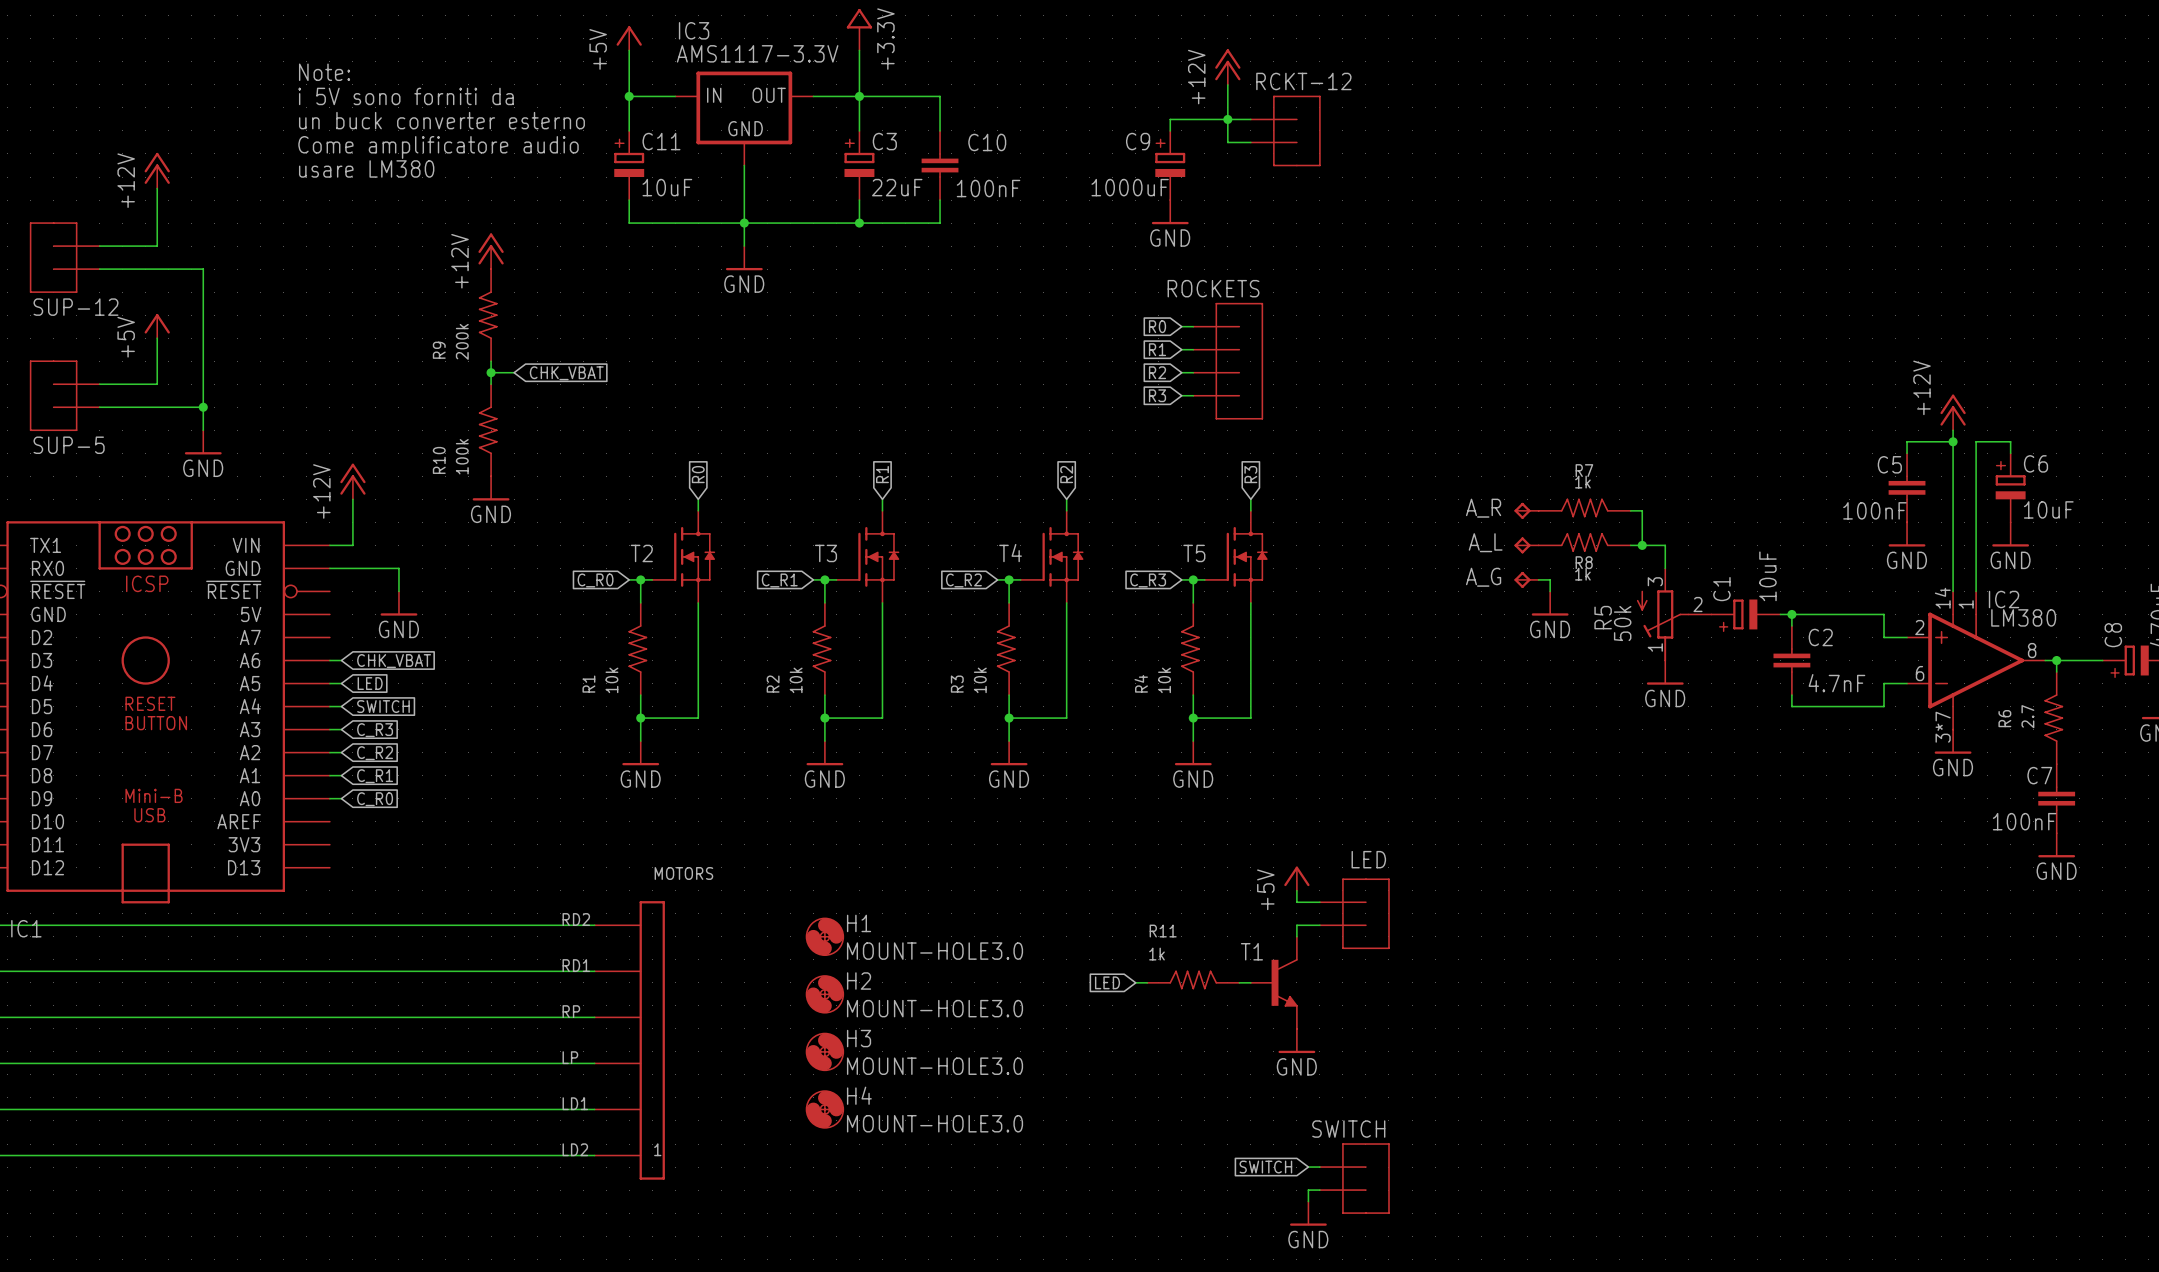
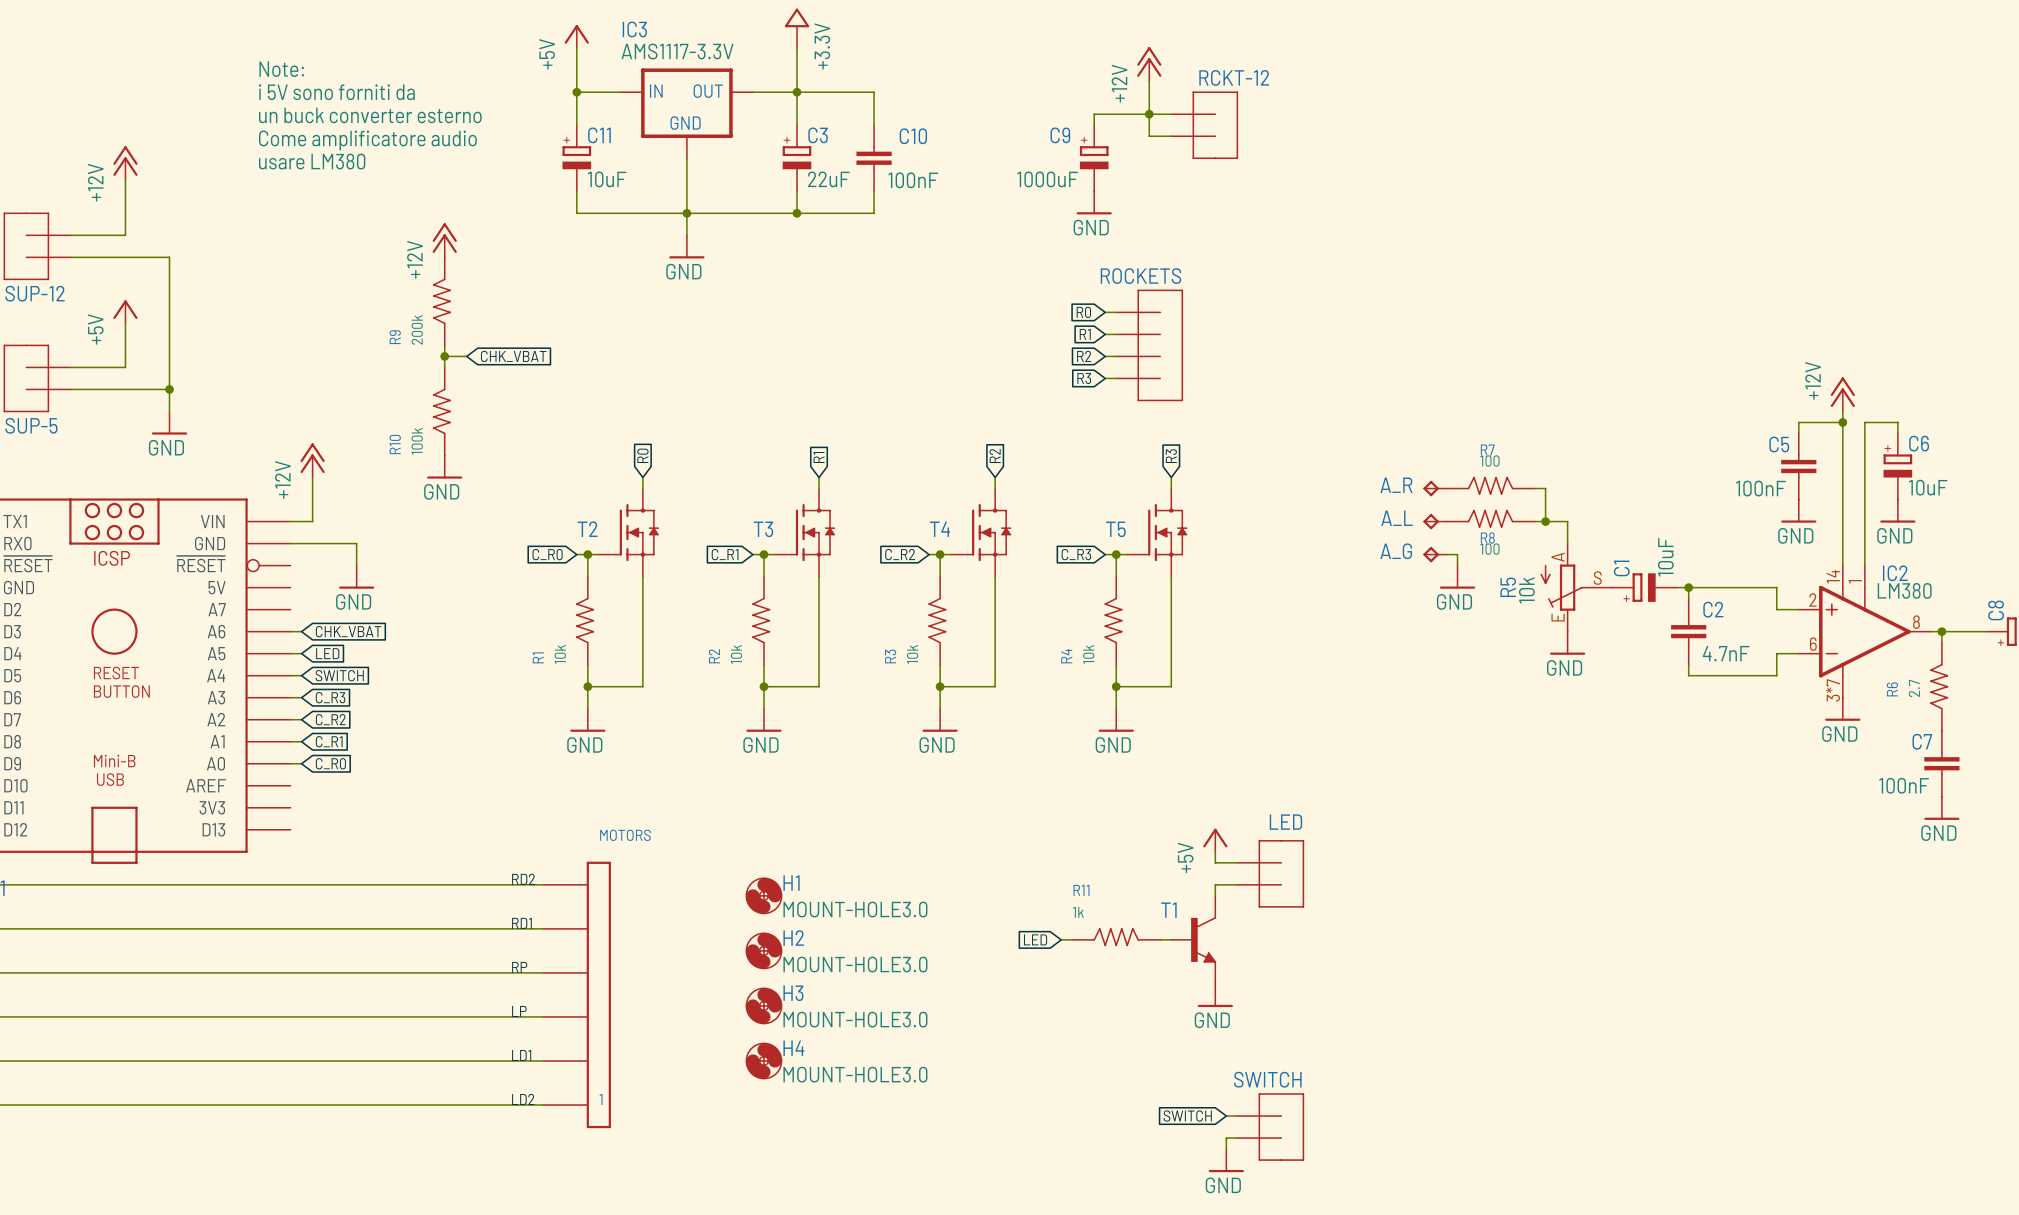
R7 value: 1k (1582, 482) -> 100 (1489, 461)
R5 symbol: [1636, 568, 1712, 662] -> [1540, 543, 1612, 632]
R8 value: 1k (1582, 574) -> 100 (1489, 549)
R5 value: 50k (1622, 623) -> 10k (1526, 590)

